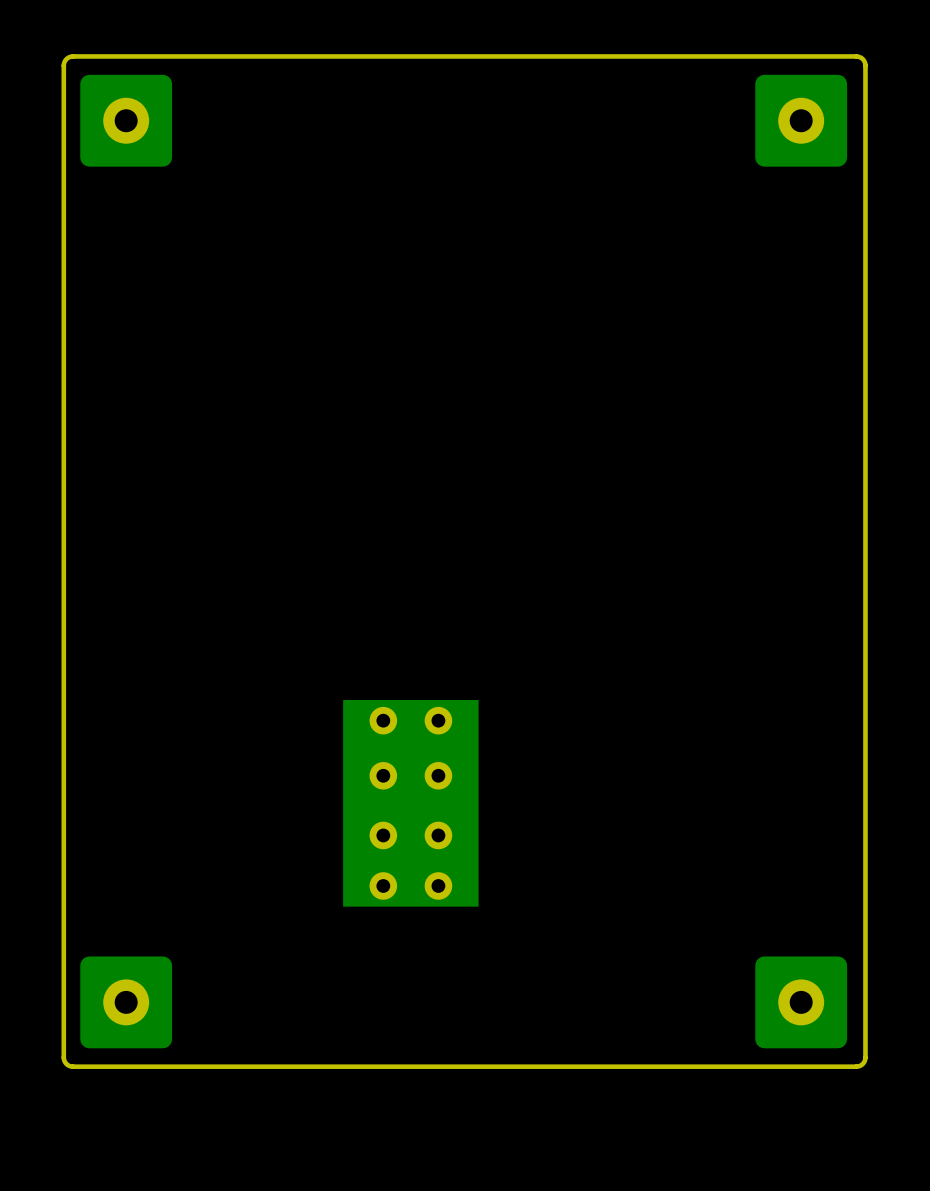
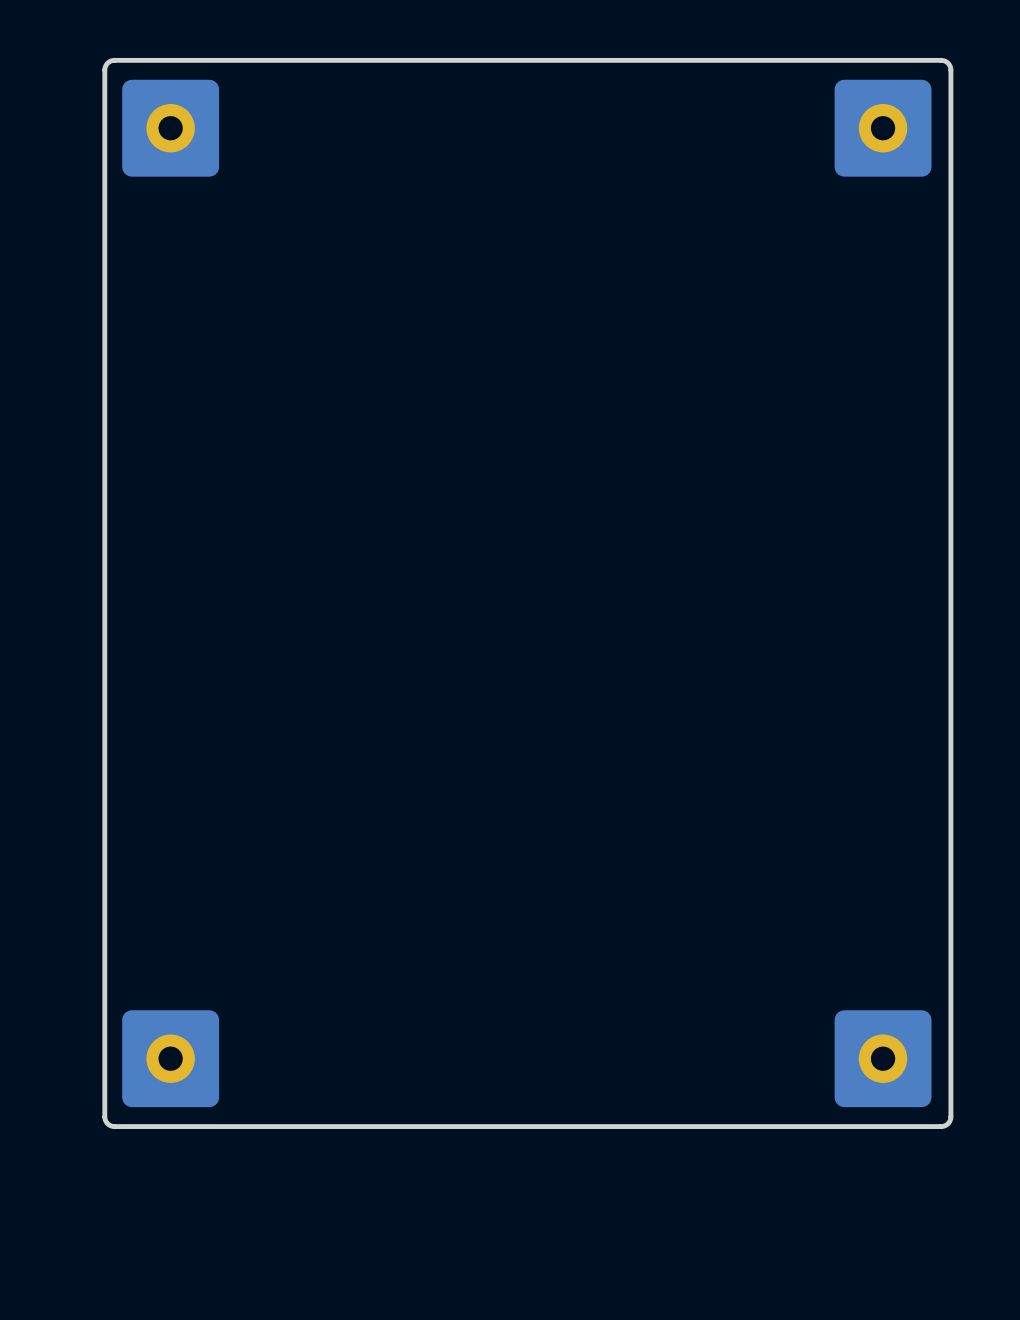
part: (410, 803) -> none

